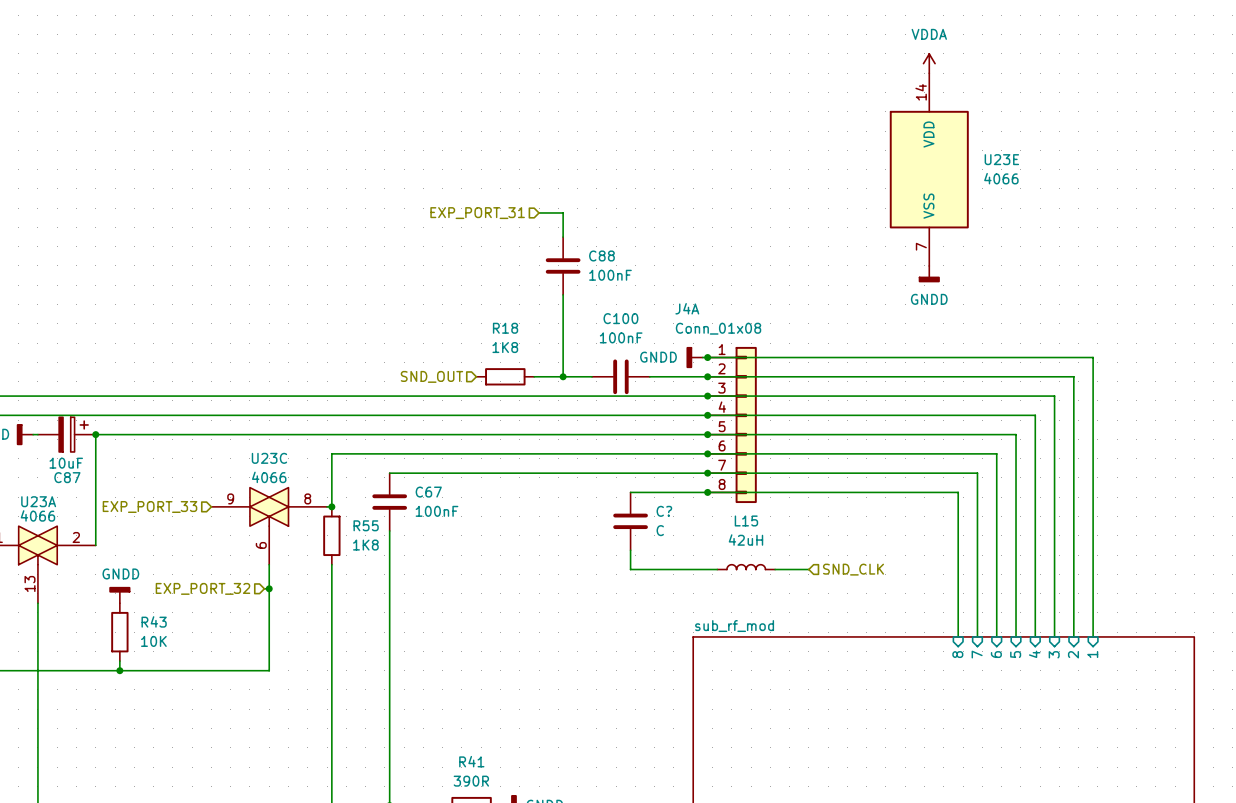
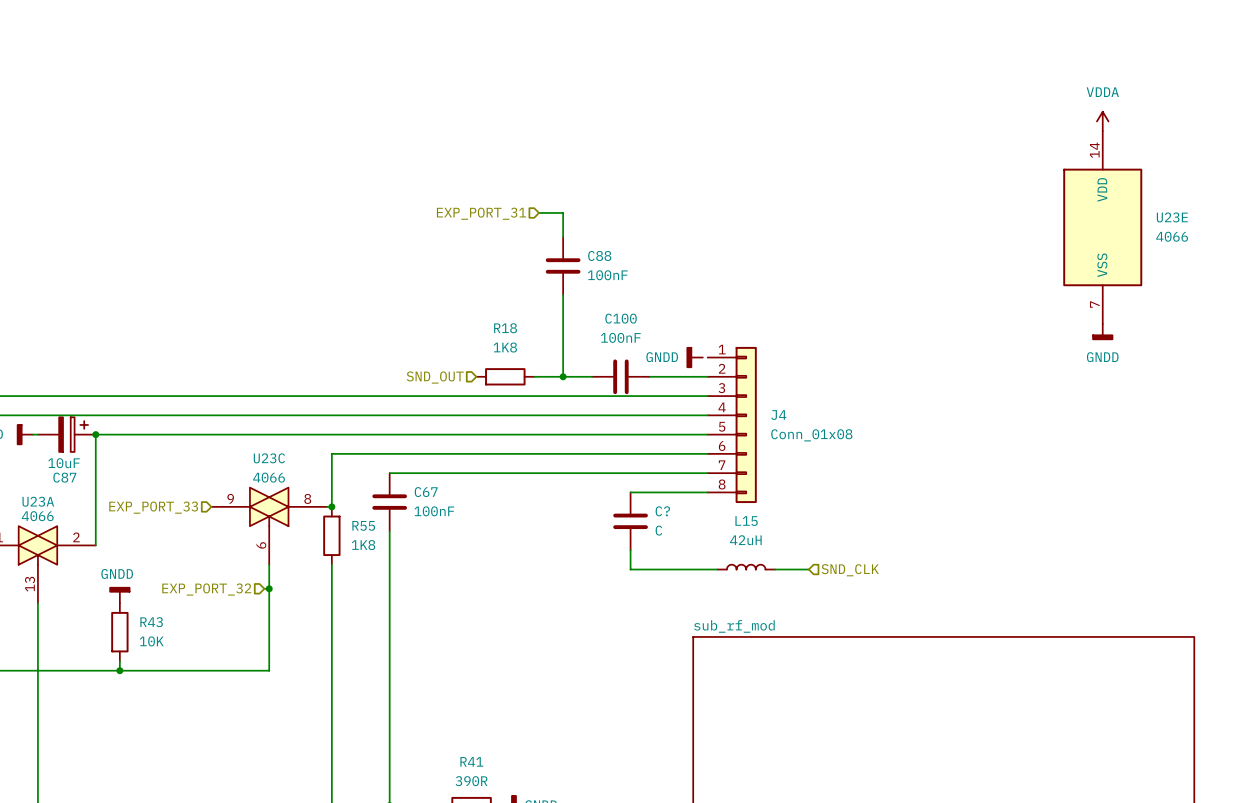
power symbol position: VDDA (929, 63) -> VDDA (1102, 121)
U23E position: (929, 169) -> (1102, 227)
power symbol position: GNDD (929, 274) -> GNDD (1102, 331)
J4A name: J4A (687, 308) -> J4 (778, 415)
J4A value position: Conn_01x08 (718, 328) -> Conn_01x08 (811, 435)
wire: (702, 357) (1093, 357) (1093, 636) -> none
junction: (707, 357) -> none
wire: (707, 376) (1073, 376) (1073, 636) -> none
junction: (707, 376) -> none
wire: (707, 396) (1054, 396) (1054, 636) -> none
junction: (707, 396) -> none
wire: (707, 415) (1035, 415) (1035, 636) -> none
junction: (707, 415) -> none
wire: (707, 434) (1016, 434) (1016, 636) -> none
junction: (707, 434) -> none
wire: (707, 453) (996, 453) (996, 636) -> none
junction: (707, 453) -> none
wire: (707, 473) (977, 473) (977, 636) -> none
junction: (707, 473) -> none
wire: (707, 492) (958, 492) (958, 636) -> none
junction: (707, 492) -> none
sheet pin: 8 (957, 654) -> none
sheet pin: 7 (977, 654) -> none
sheet pin: 6 (996, 654) -> none
sheet pin: 5 (1015, 654) -> none
sheet pin: 4 (1034, 654) -> none
sheet pin: 3 (1054, 654) -> none
sheet pin: 2 (1073, 654) -> none
sheet pin: 1 (1092, 654) -> none

